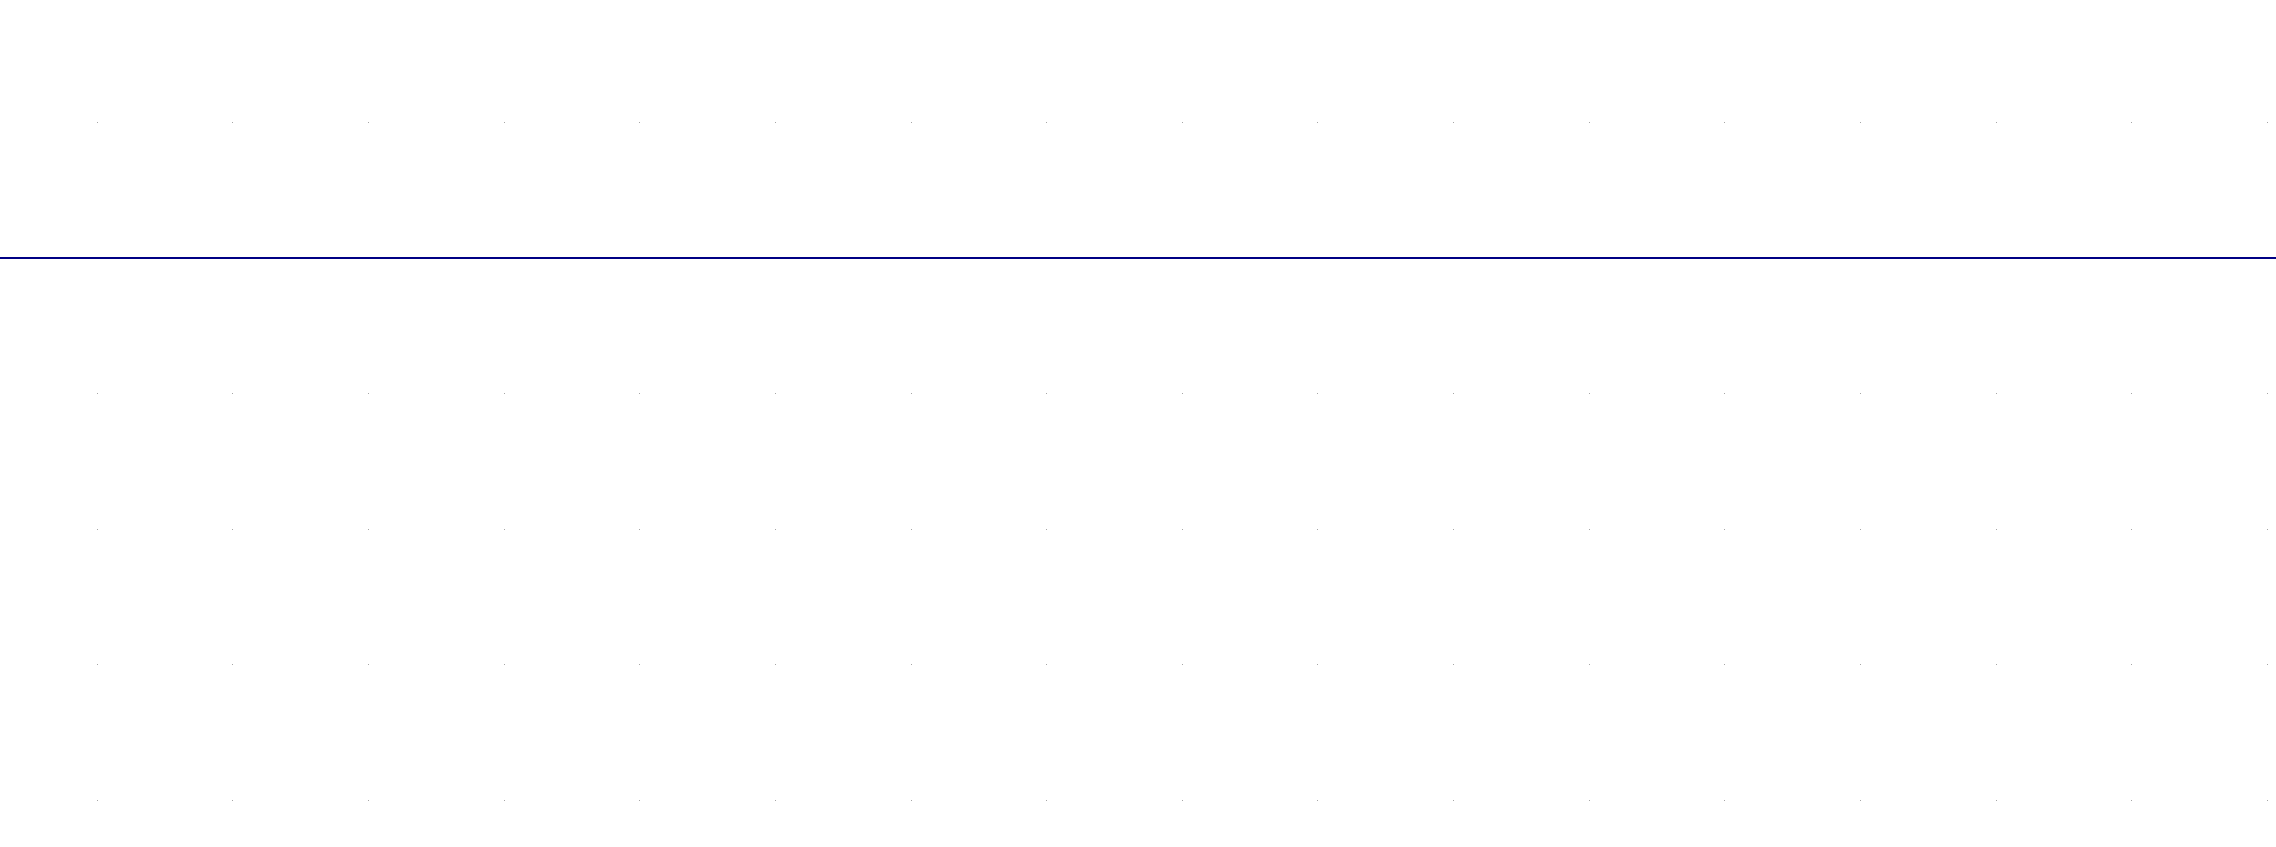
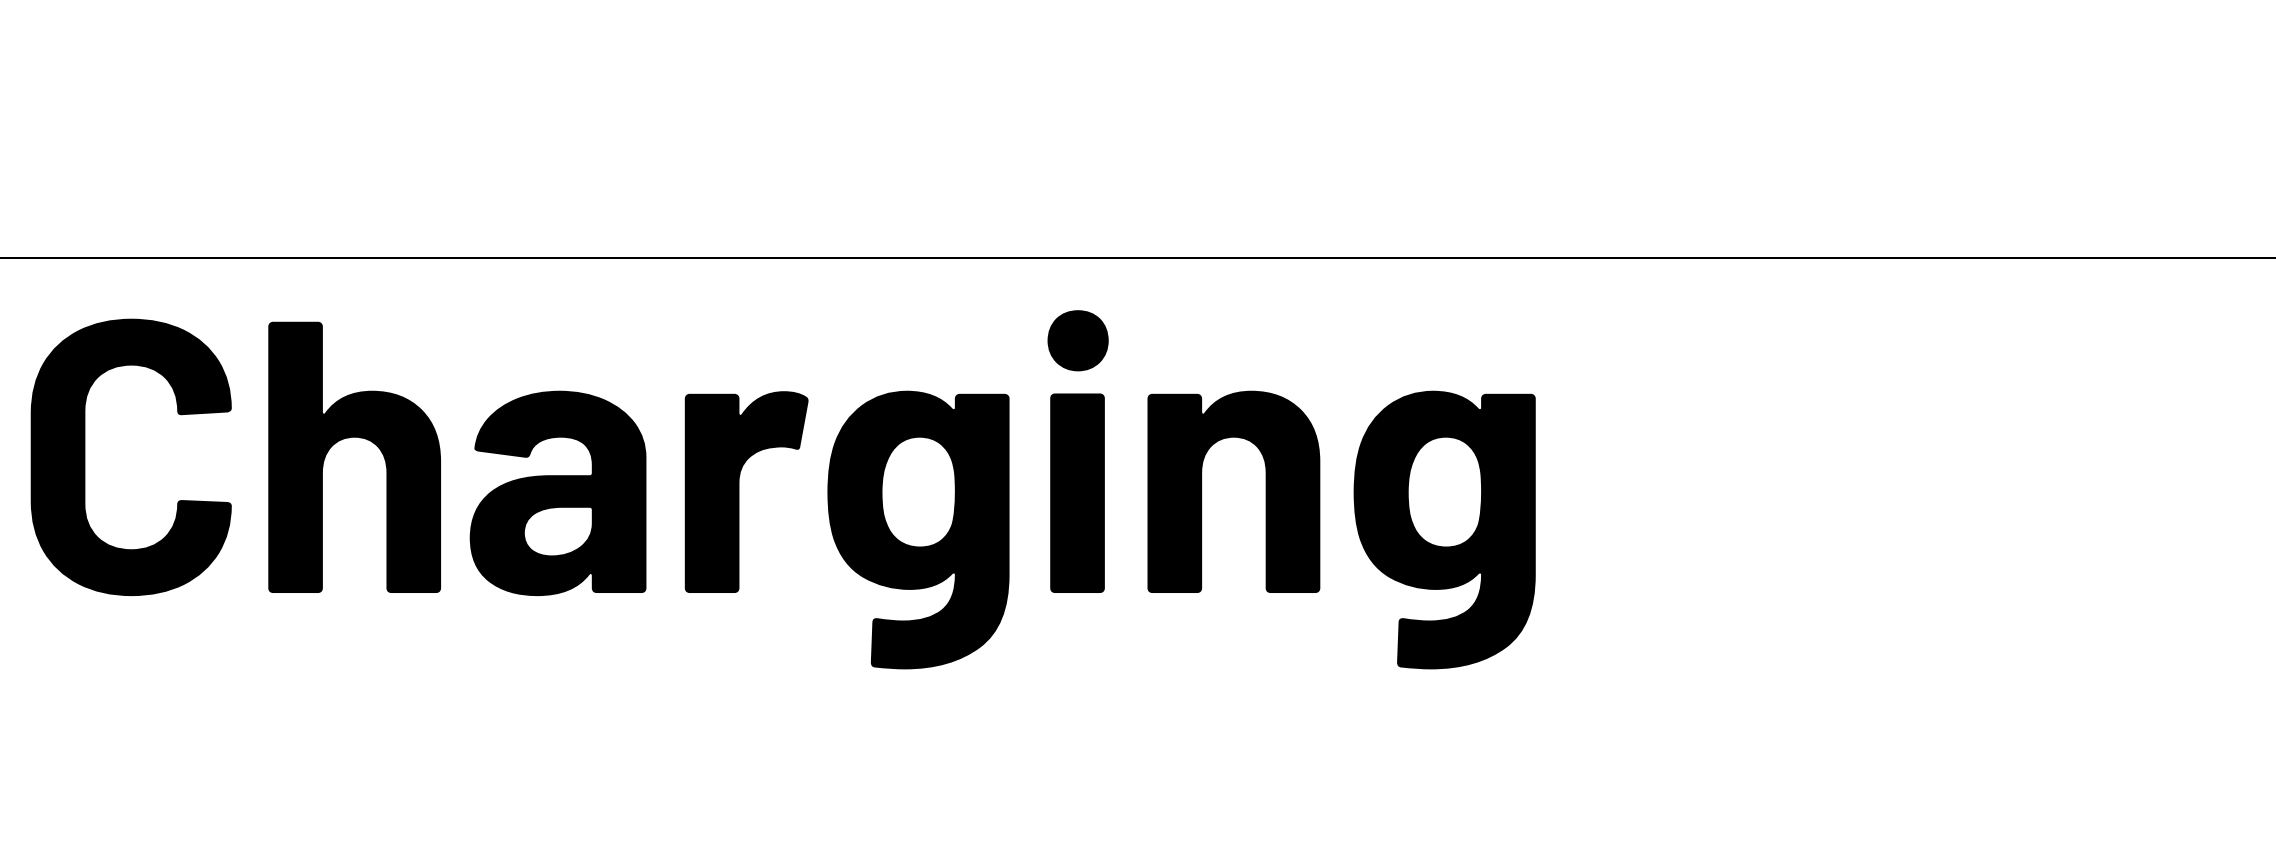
text: none -> Charging (783, 489)

